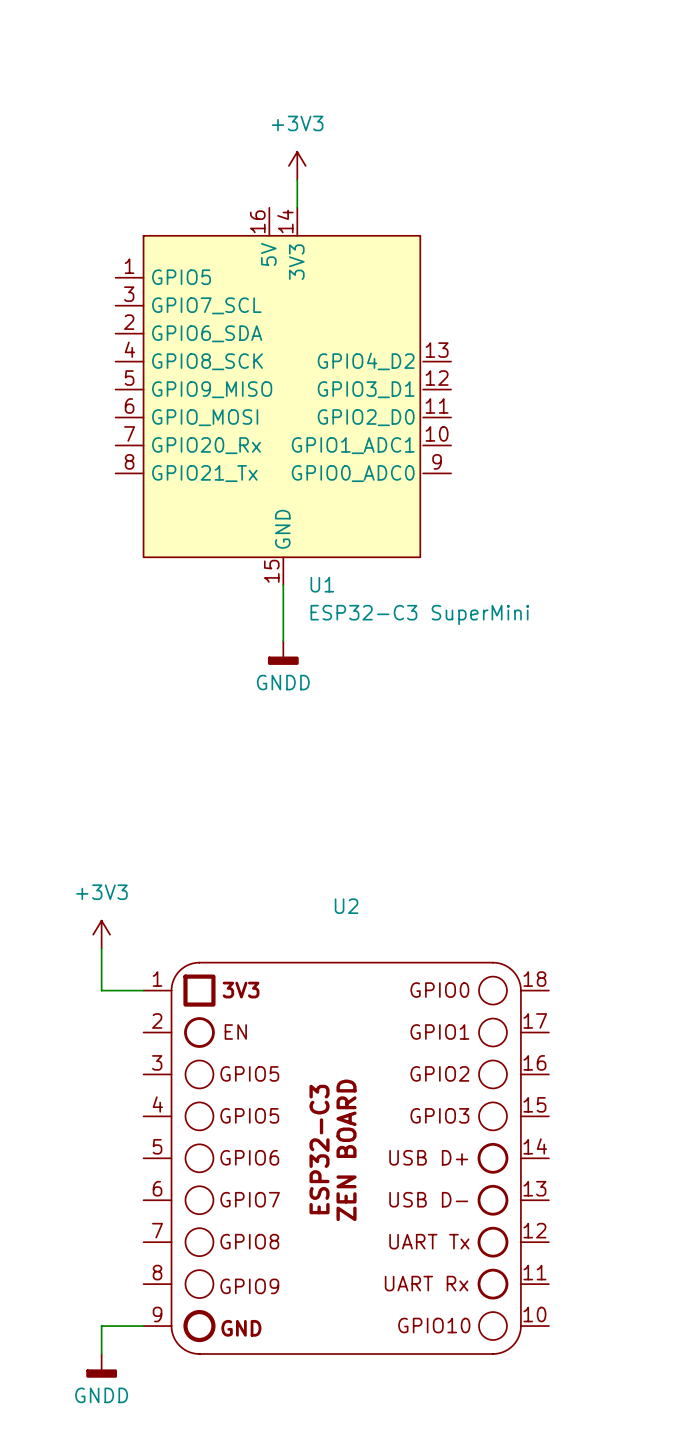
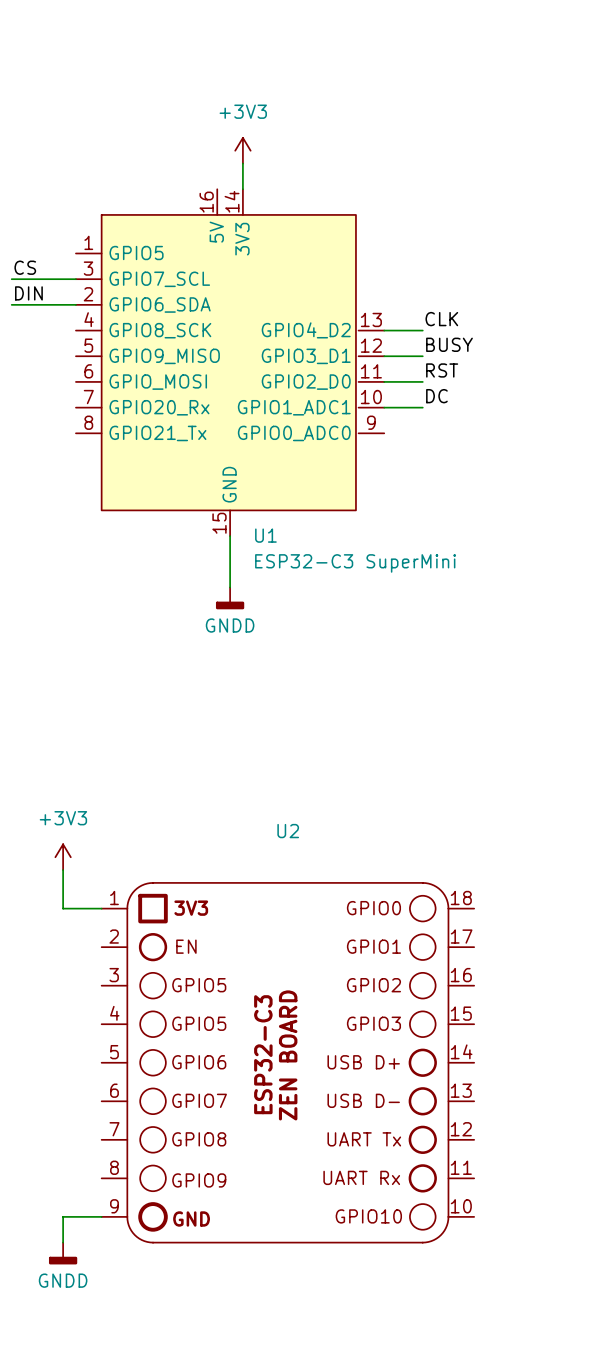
label: none -> CS (25, 267)
wire: none -> (11, 279) (75, 279)
label: none -> DIN (28, 293)
wire: none -> (11, 304) (75, 304)
label: none -> CLK (441, 319)
wire: none -> (384, 330) (422, 330)
label: none -> BUSY (449, 344)
wire: none -> (384, 356) (422, 356)
label: none -> RST (442, 370)
wire: none -> (384, 381) (422, 381)
label: none -> DC (436, 396)
wire: none -> (384, 407) (422, 407)

